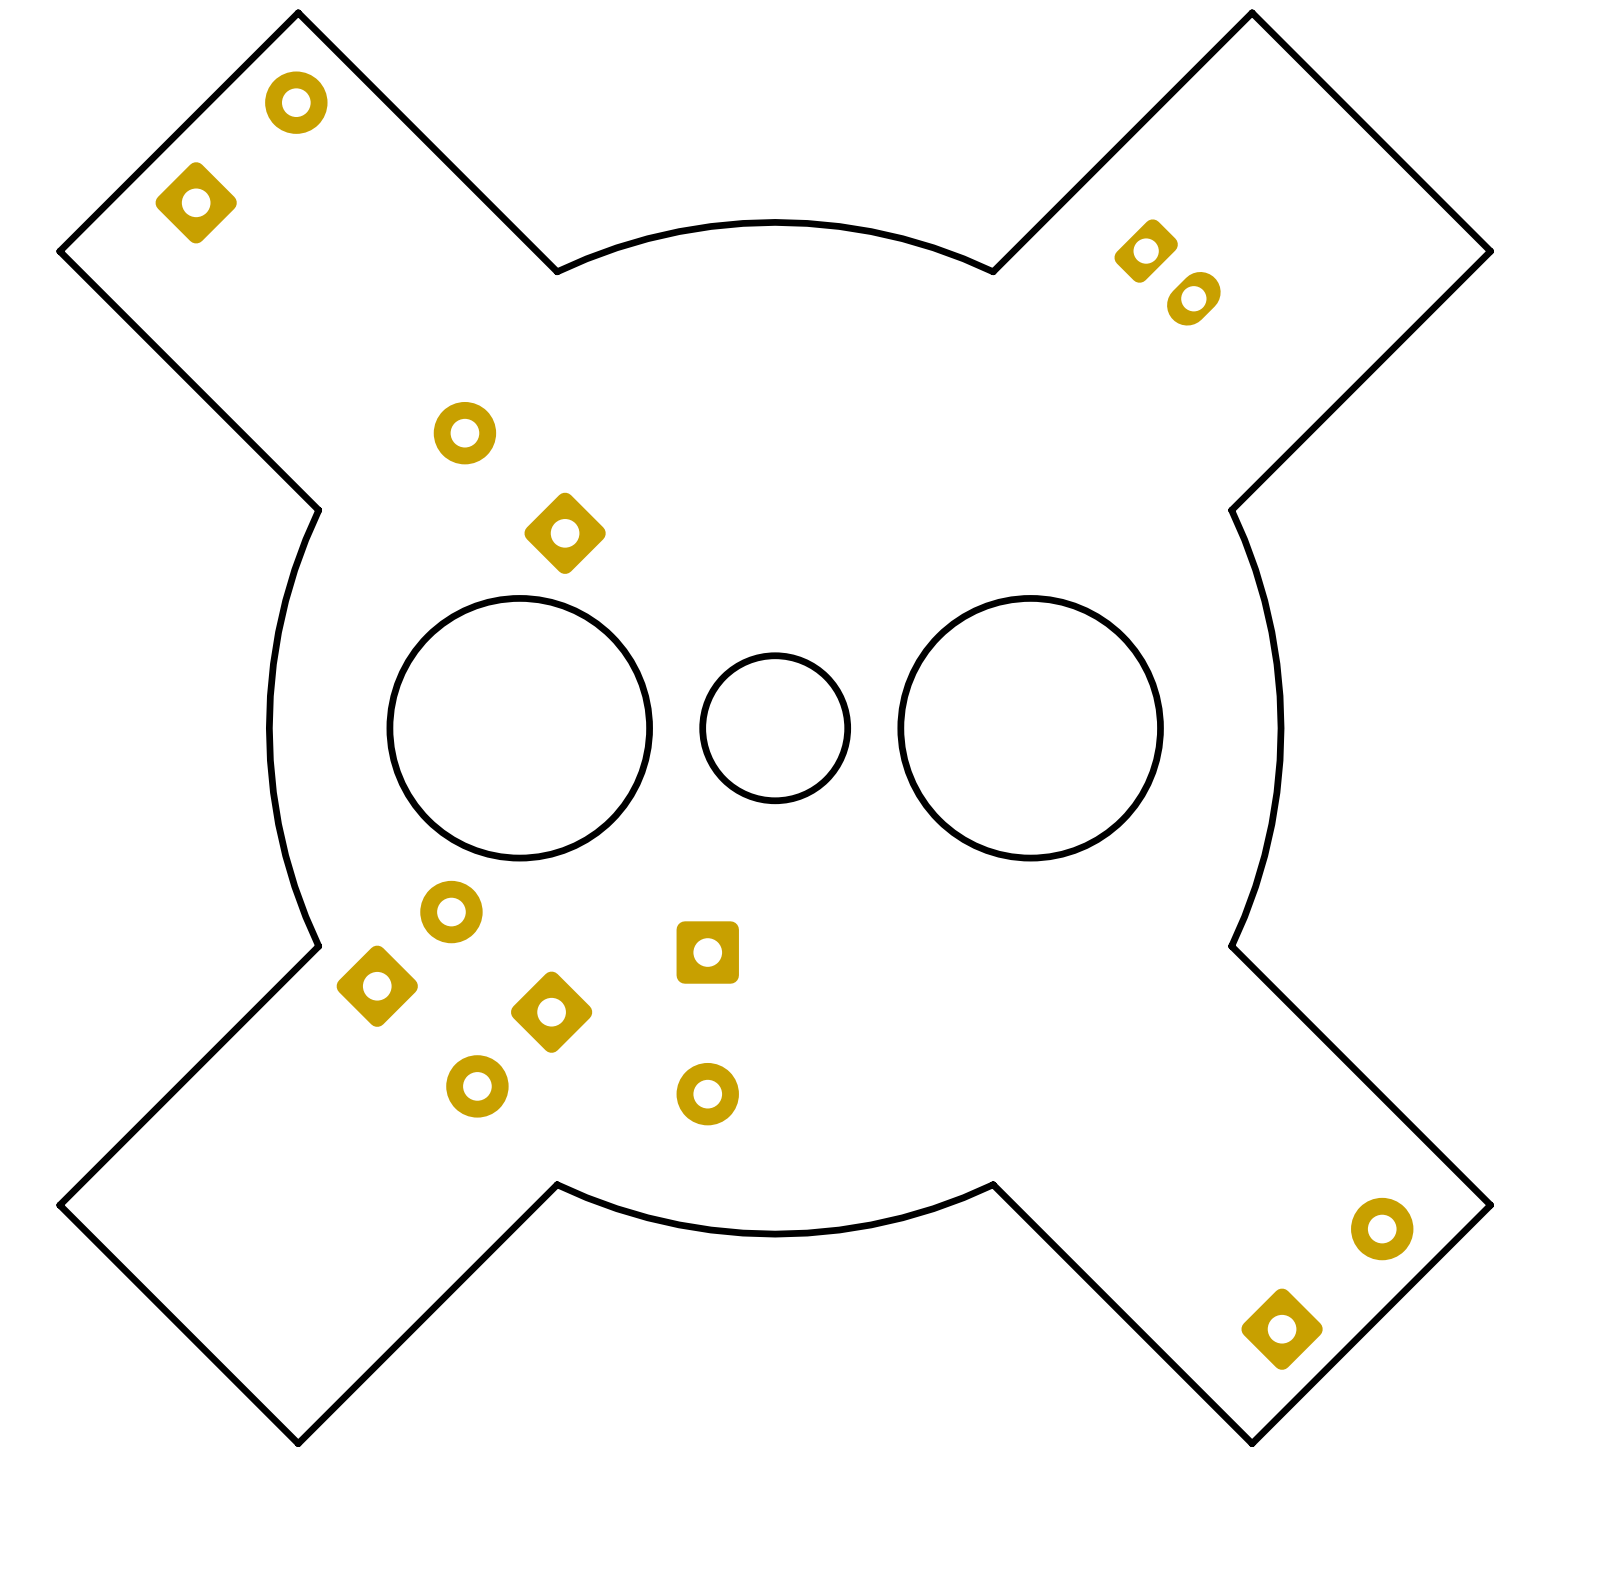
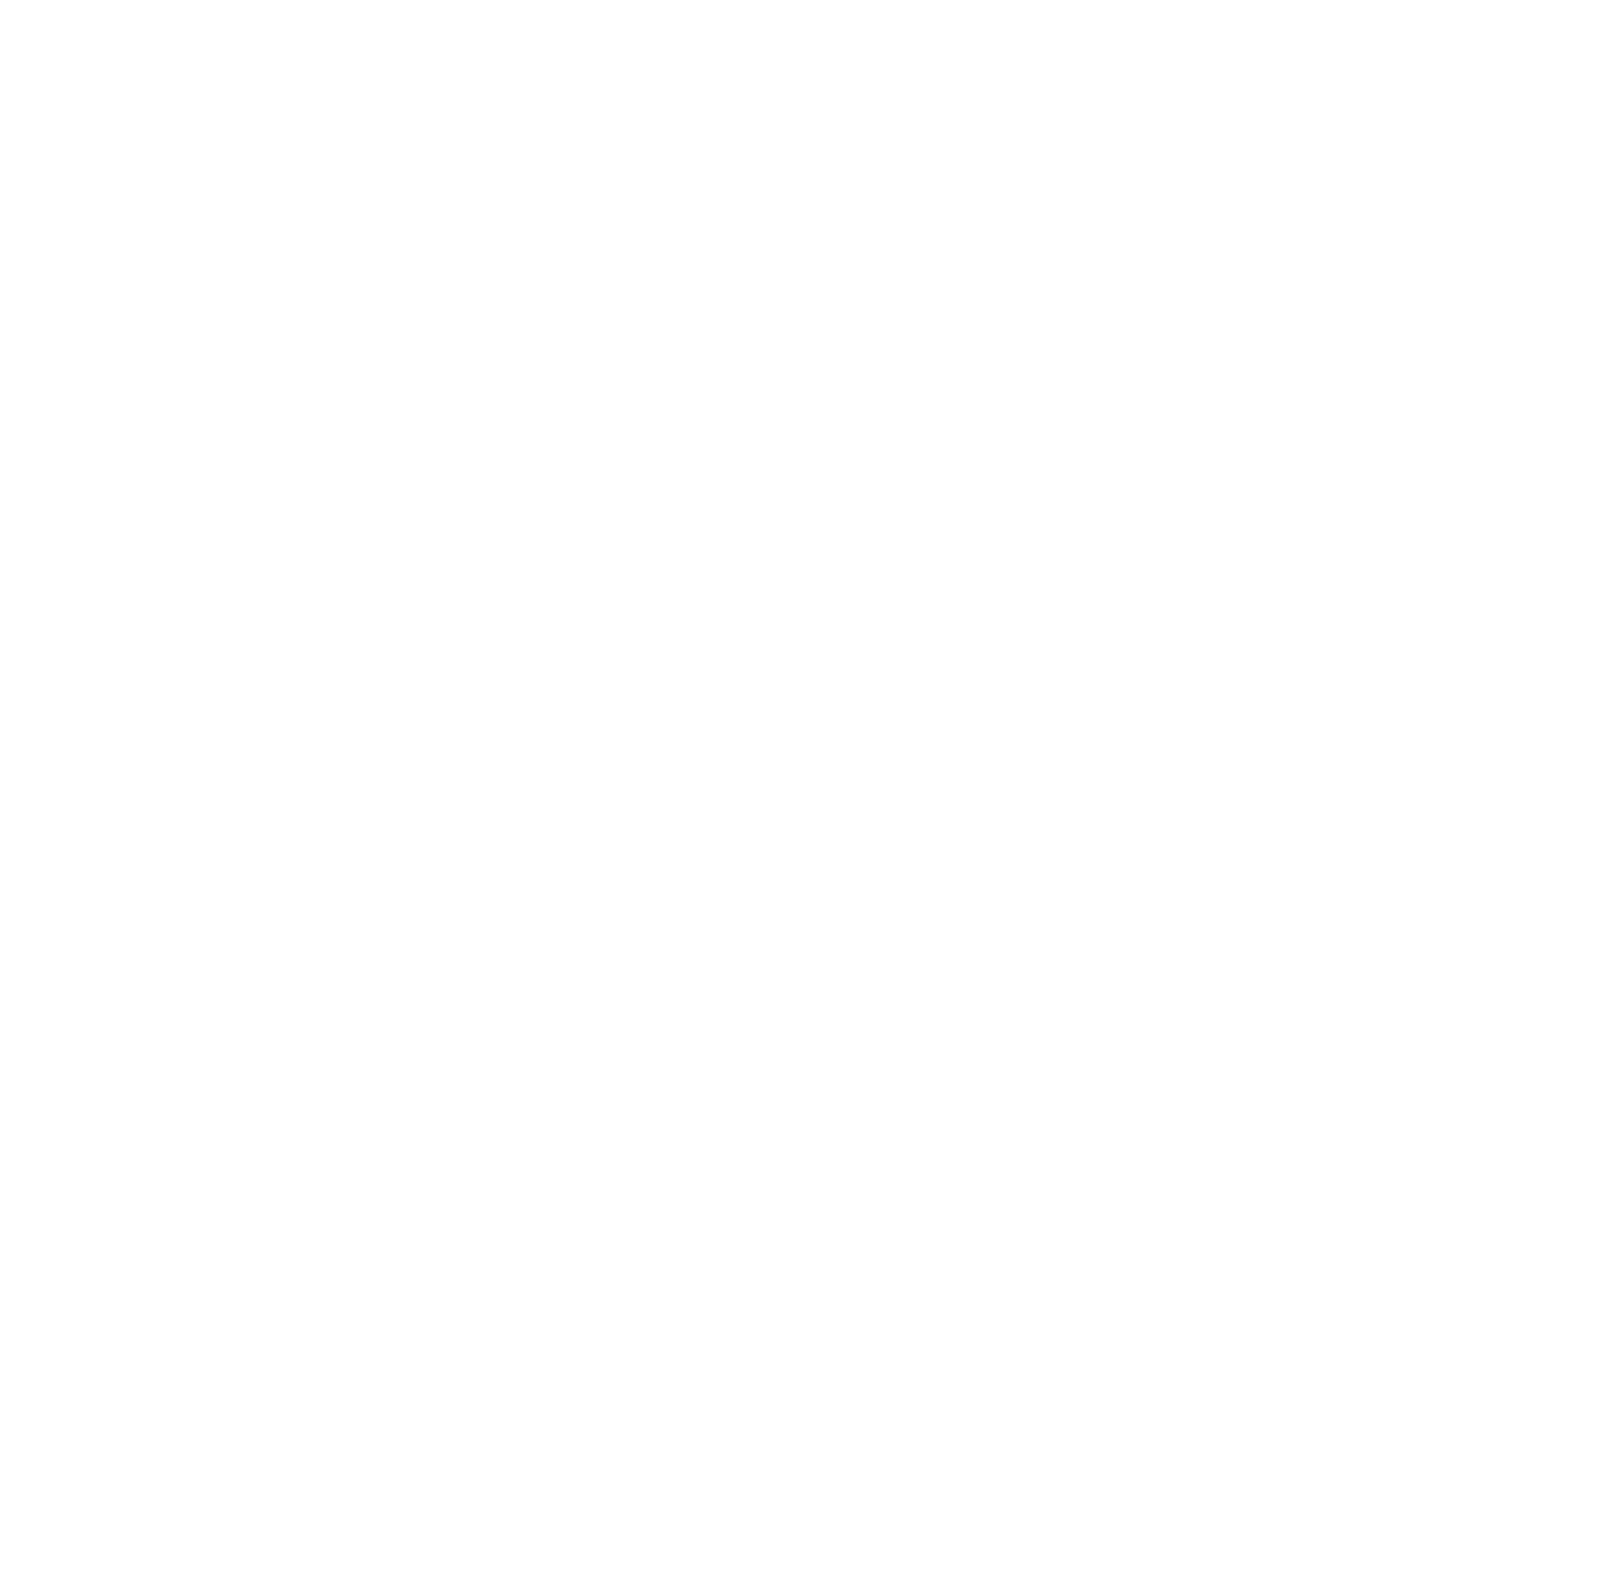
board edge: (1252, 12) (1490, 251) (1231, 510) (1244, 539) (1264, 600) (1276, 664) (1281, 728) (1276, 792) (1264, 855) (1255, 886) (1231, 946) (1490, 1205) (1252, 1443) (993, 1184) (933, 1208) (871, 1224) (839, 1230) (775, 1234) (710, 1230) (679, 1224) (616, 1208) (557, 1184) (298, 1443) (59, 1205) (318, 946) (305, 916) (285, 855) (273, 792) (269, 728) (273, 664) (278, 632) (294, 569) (318, 510) (59, 251) (298, 12) (557, 271) (616, 247) (679, 231) (710, 226) (775, 222) (839, 226) (902, 238) (963, 258) (993, 271) (1252, 12) -> none
part: (241, 157) -> none
part: (1167, 272) -> none
part: (519, 487) -> none
round board edge: [386, 595, 653, 862] -> none
round board edge: [897, 595, 1164, 862] -> none
round board edge: [699, 652, 852, 805] -> none
part: (506, 966) -> none
part: (707, 1023) -> none
part: (422, 1031) -> none
part: (1327, 1283) -> none

